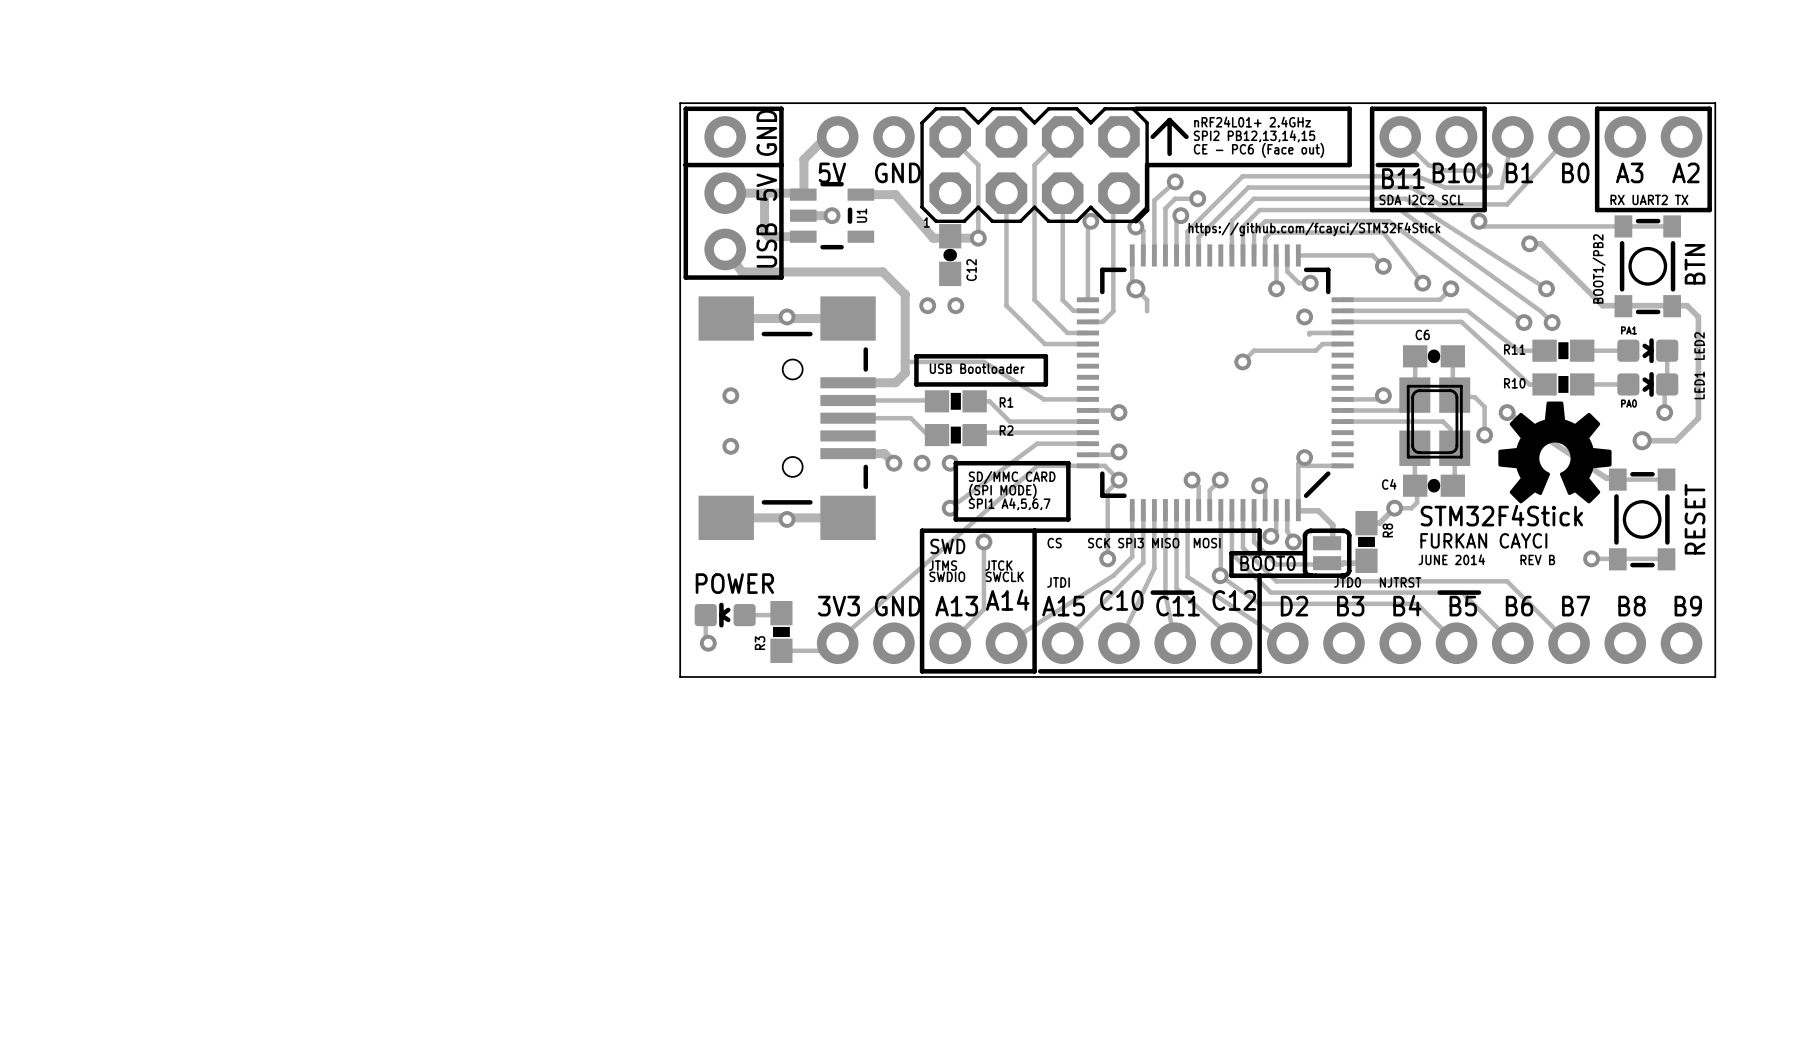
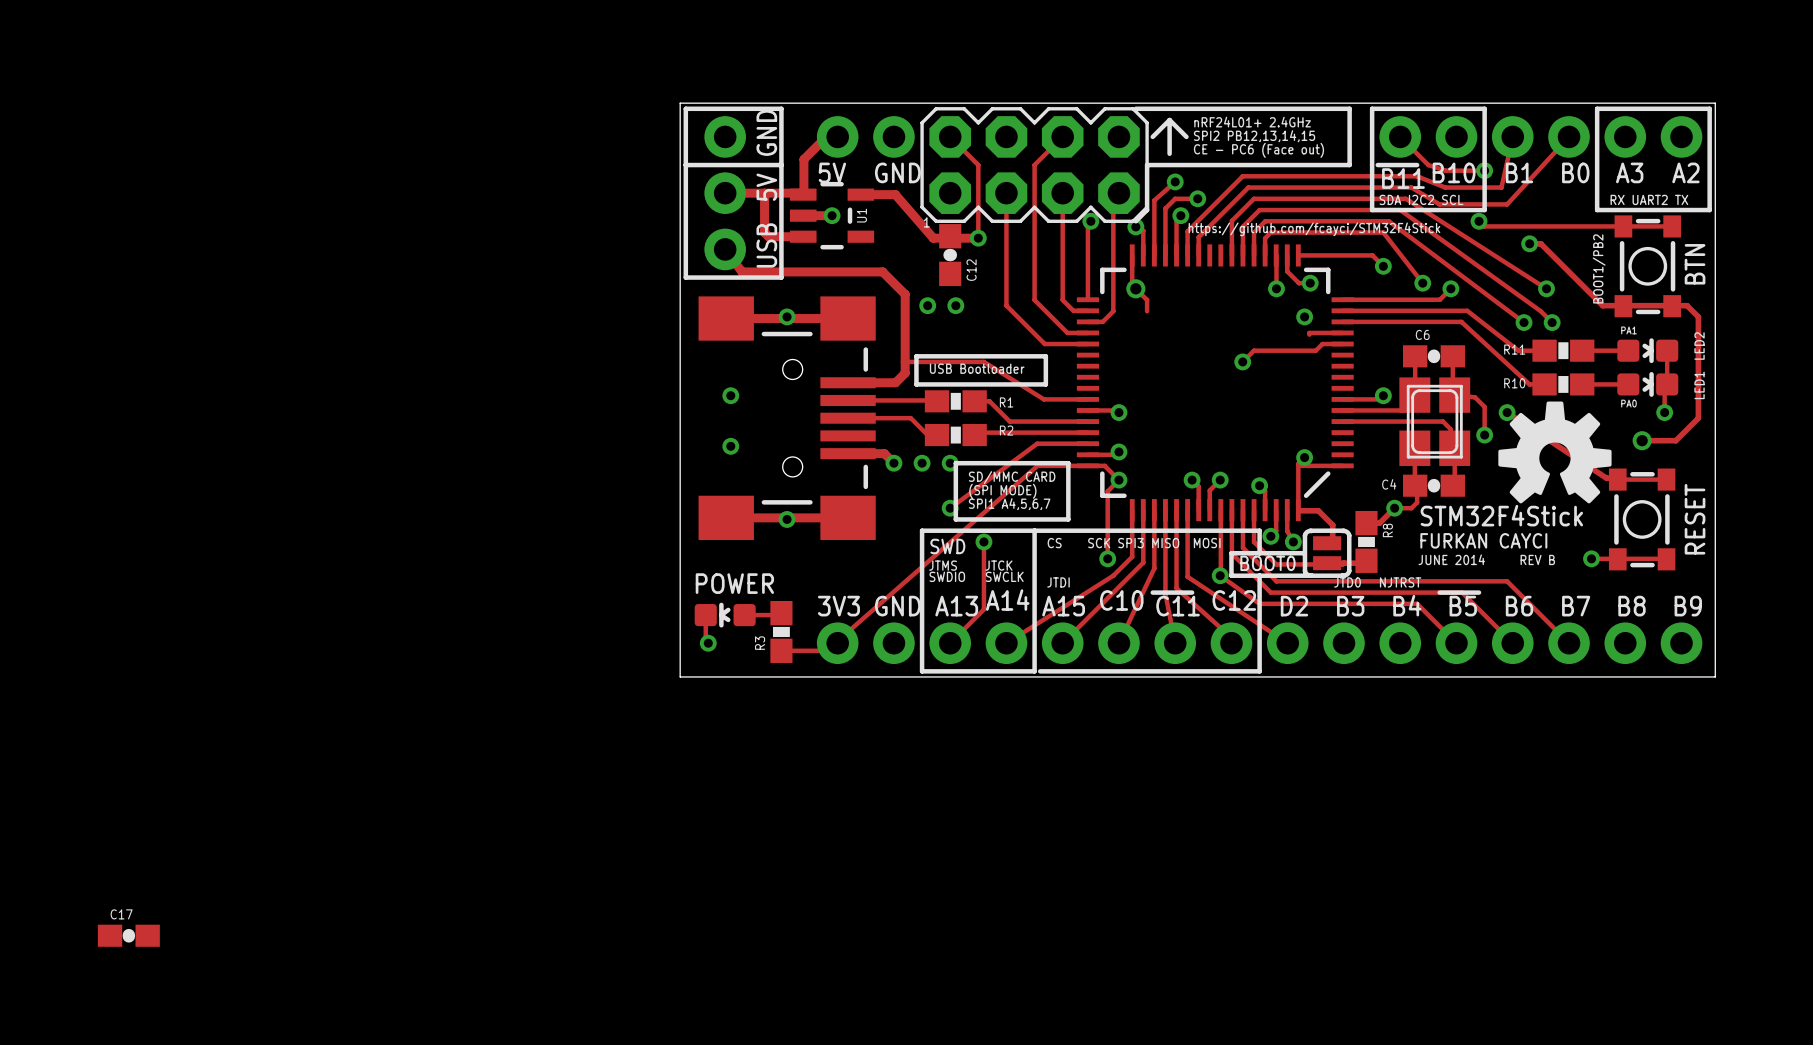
C17: none -> (128, 935)

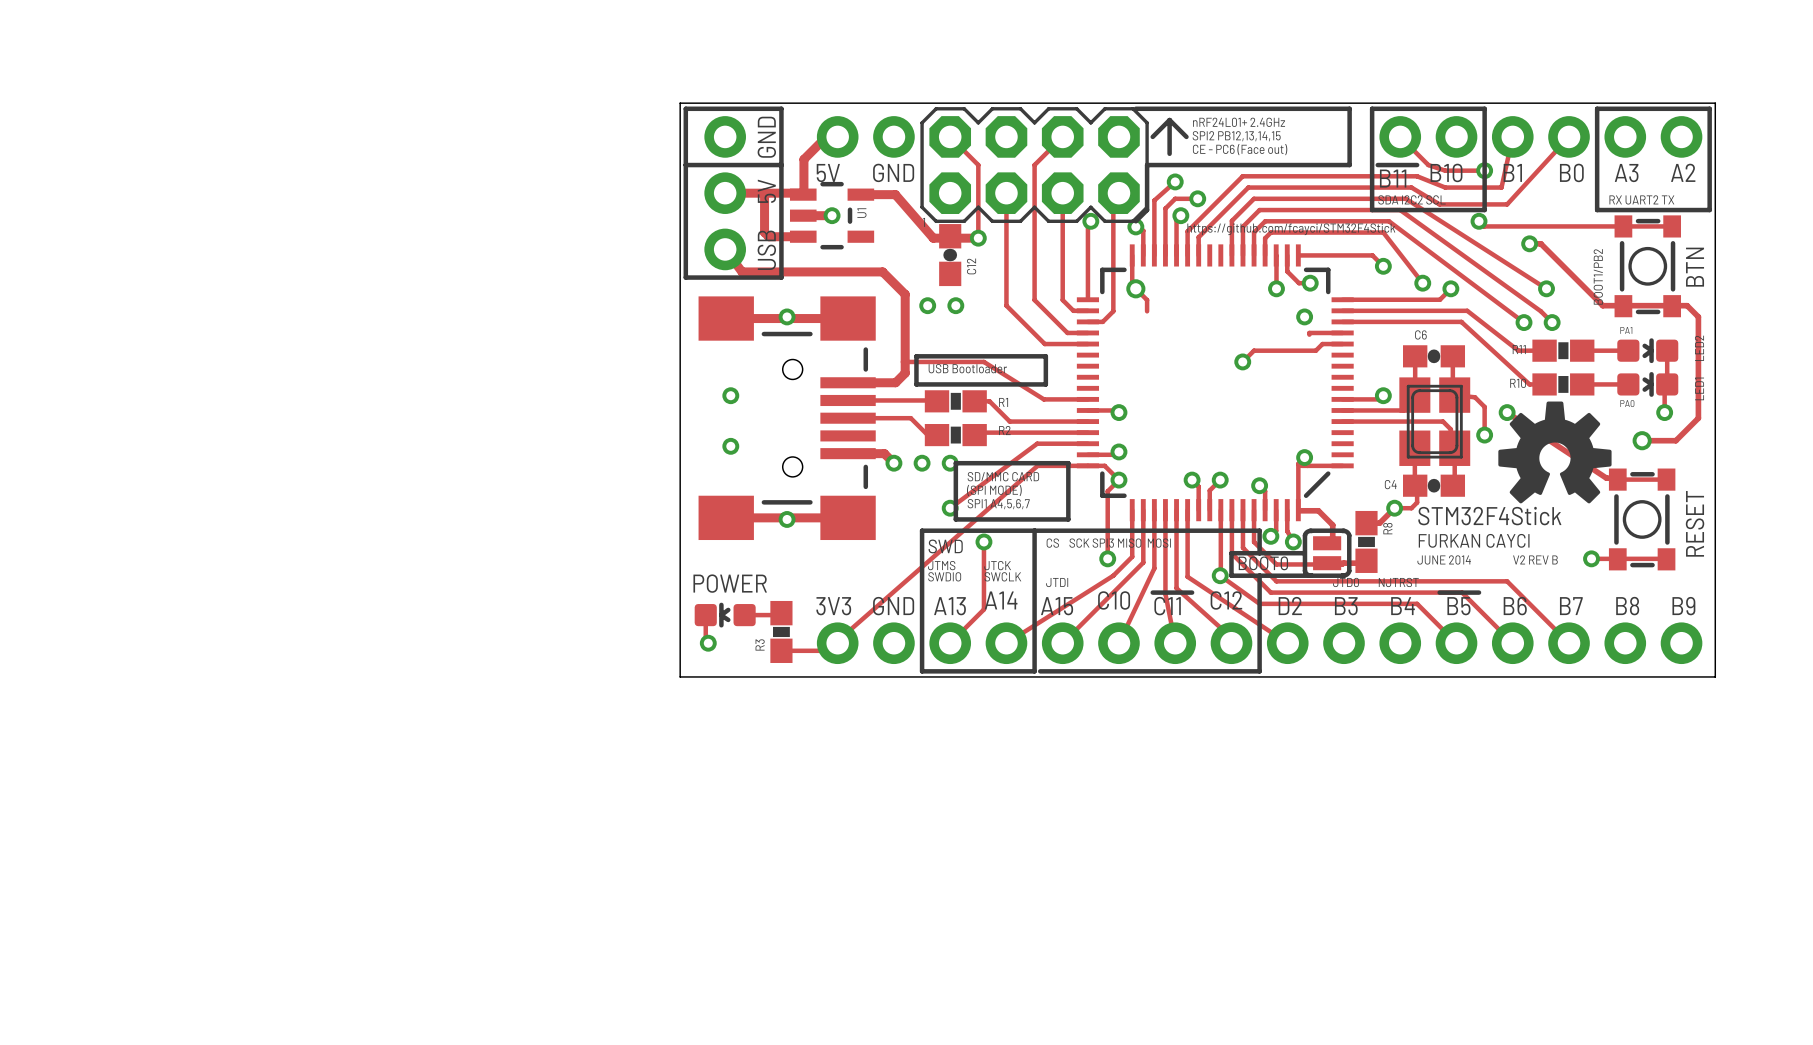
text: REV B (1537, 559) -> V2 REV B (1535, 559)
C17: (128, 935) -> none

